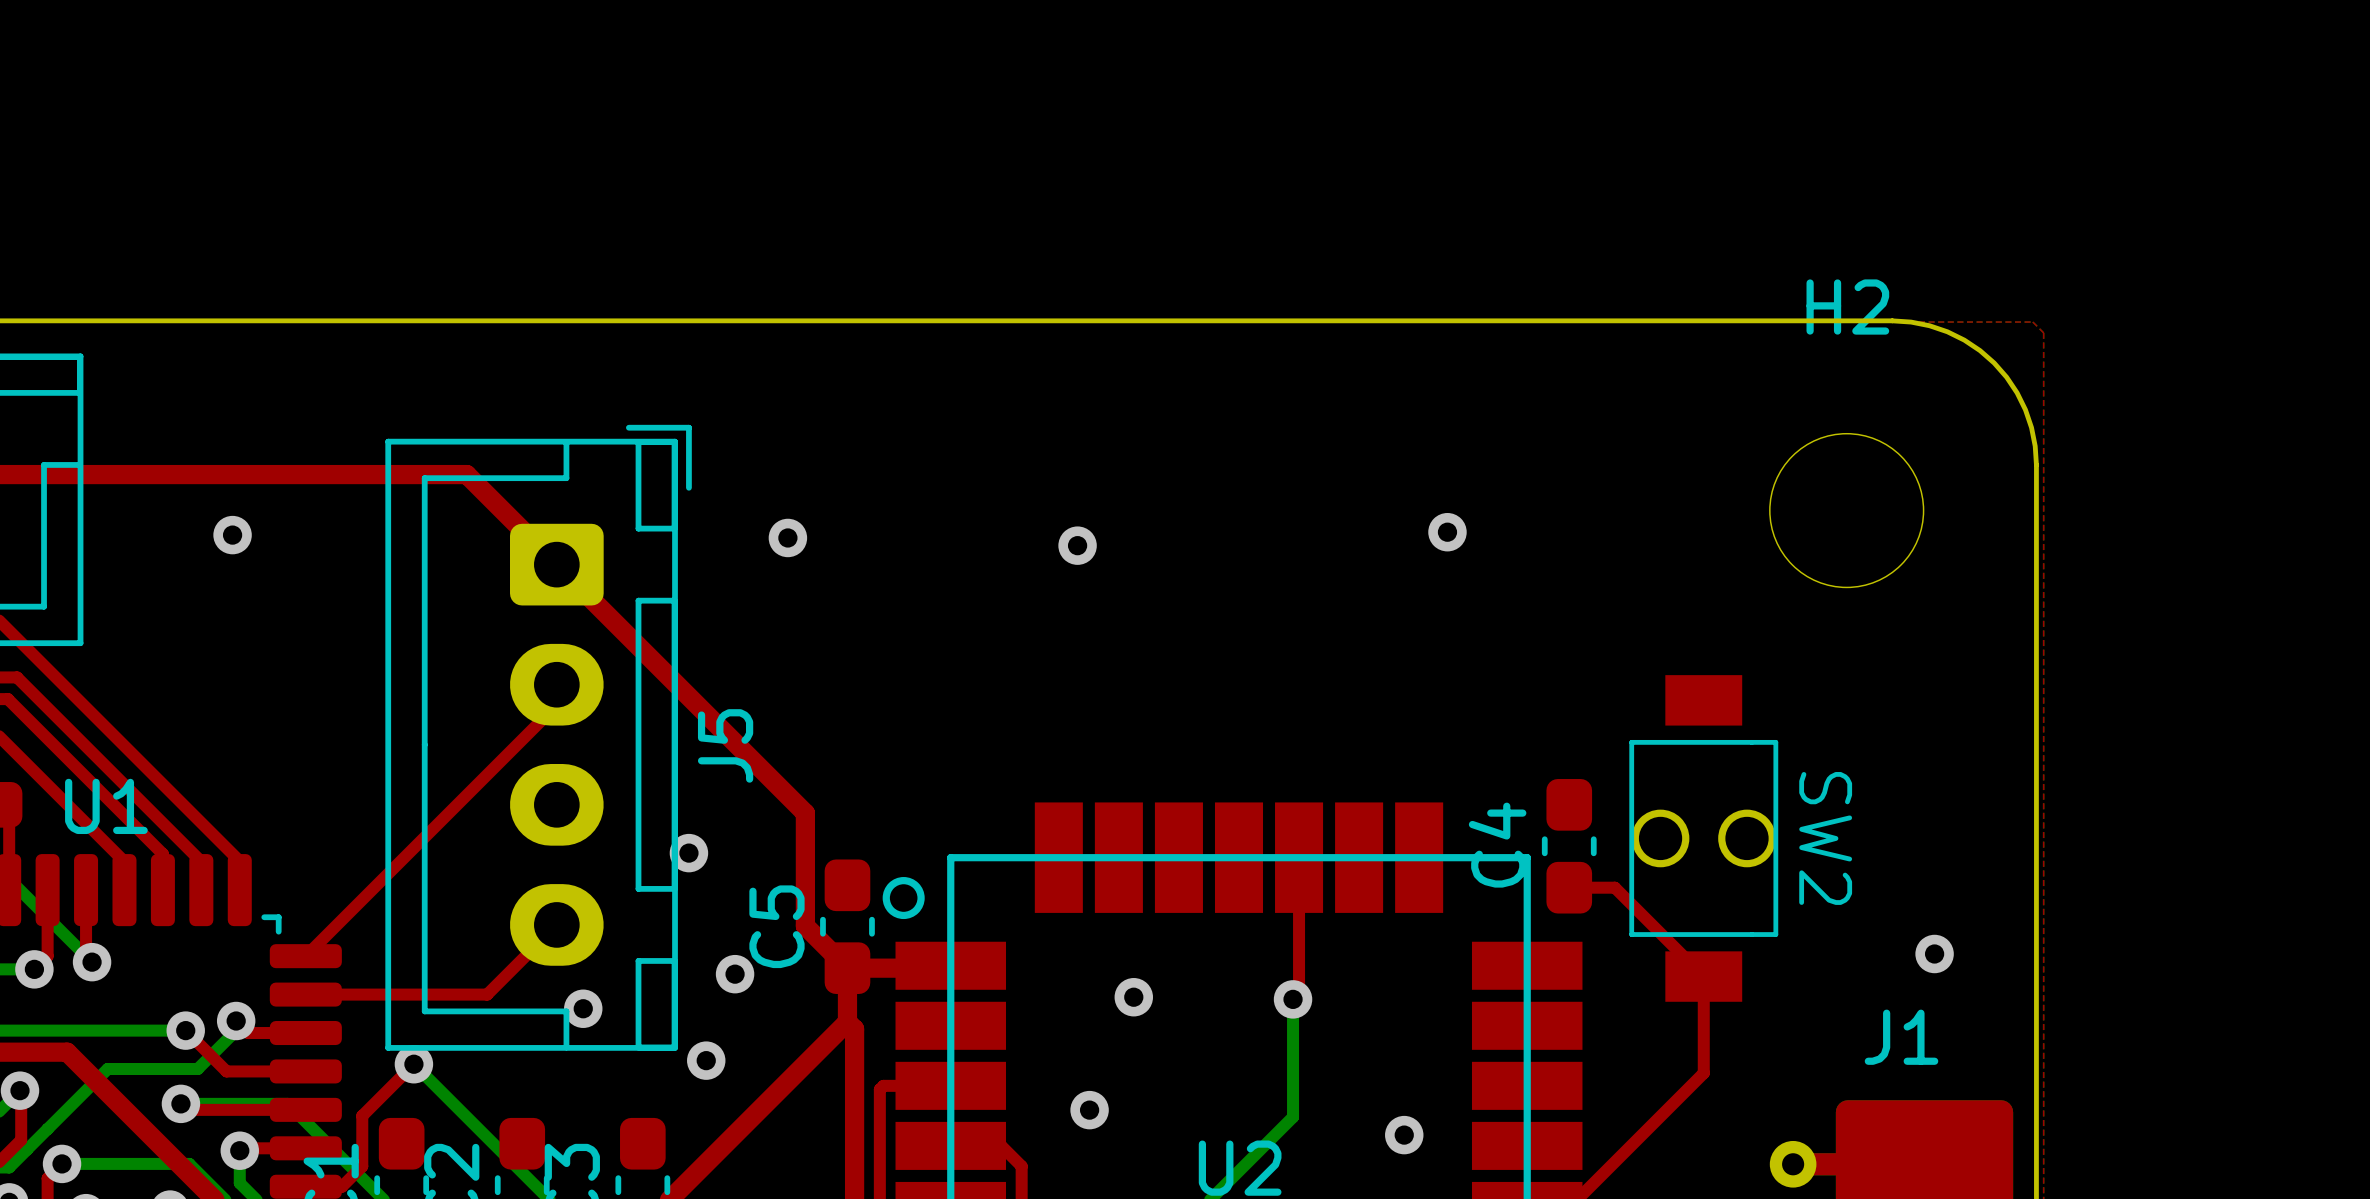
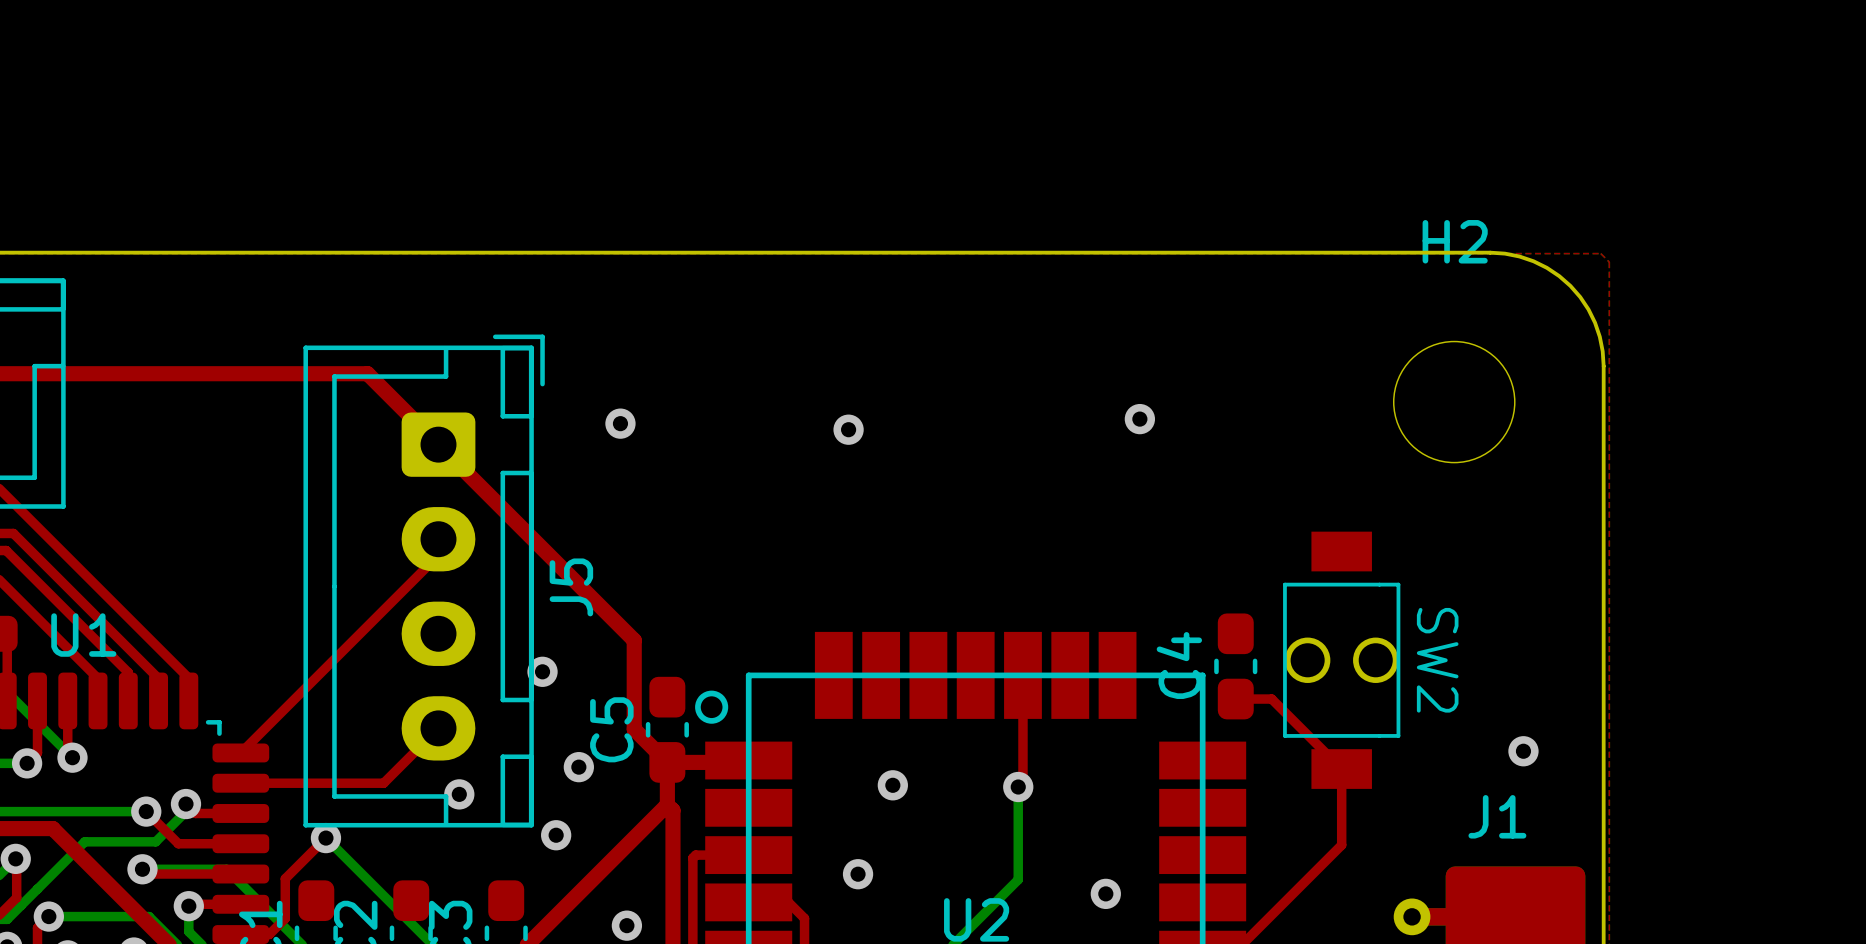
via: (232, 535) -> none
via: none -> (626, 925)

